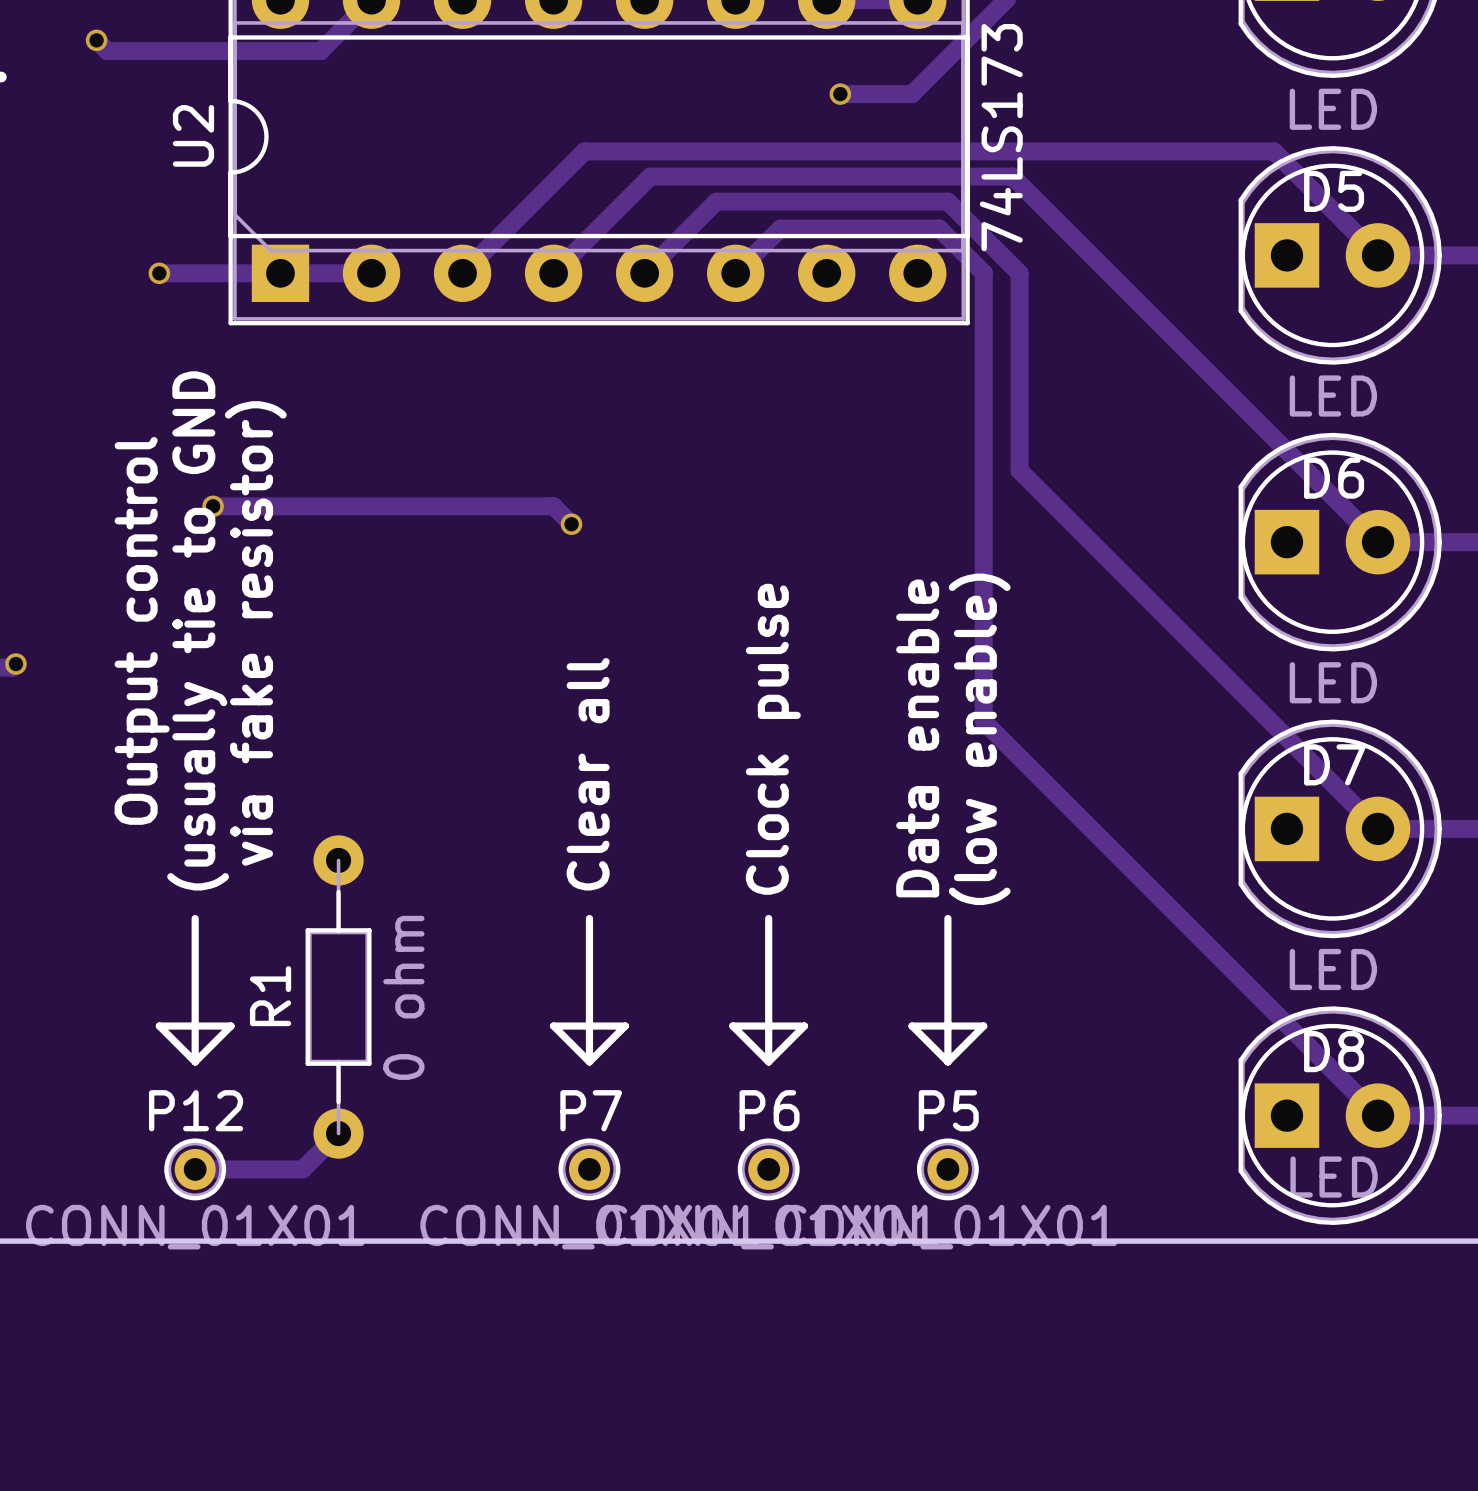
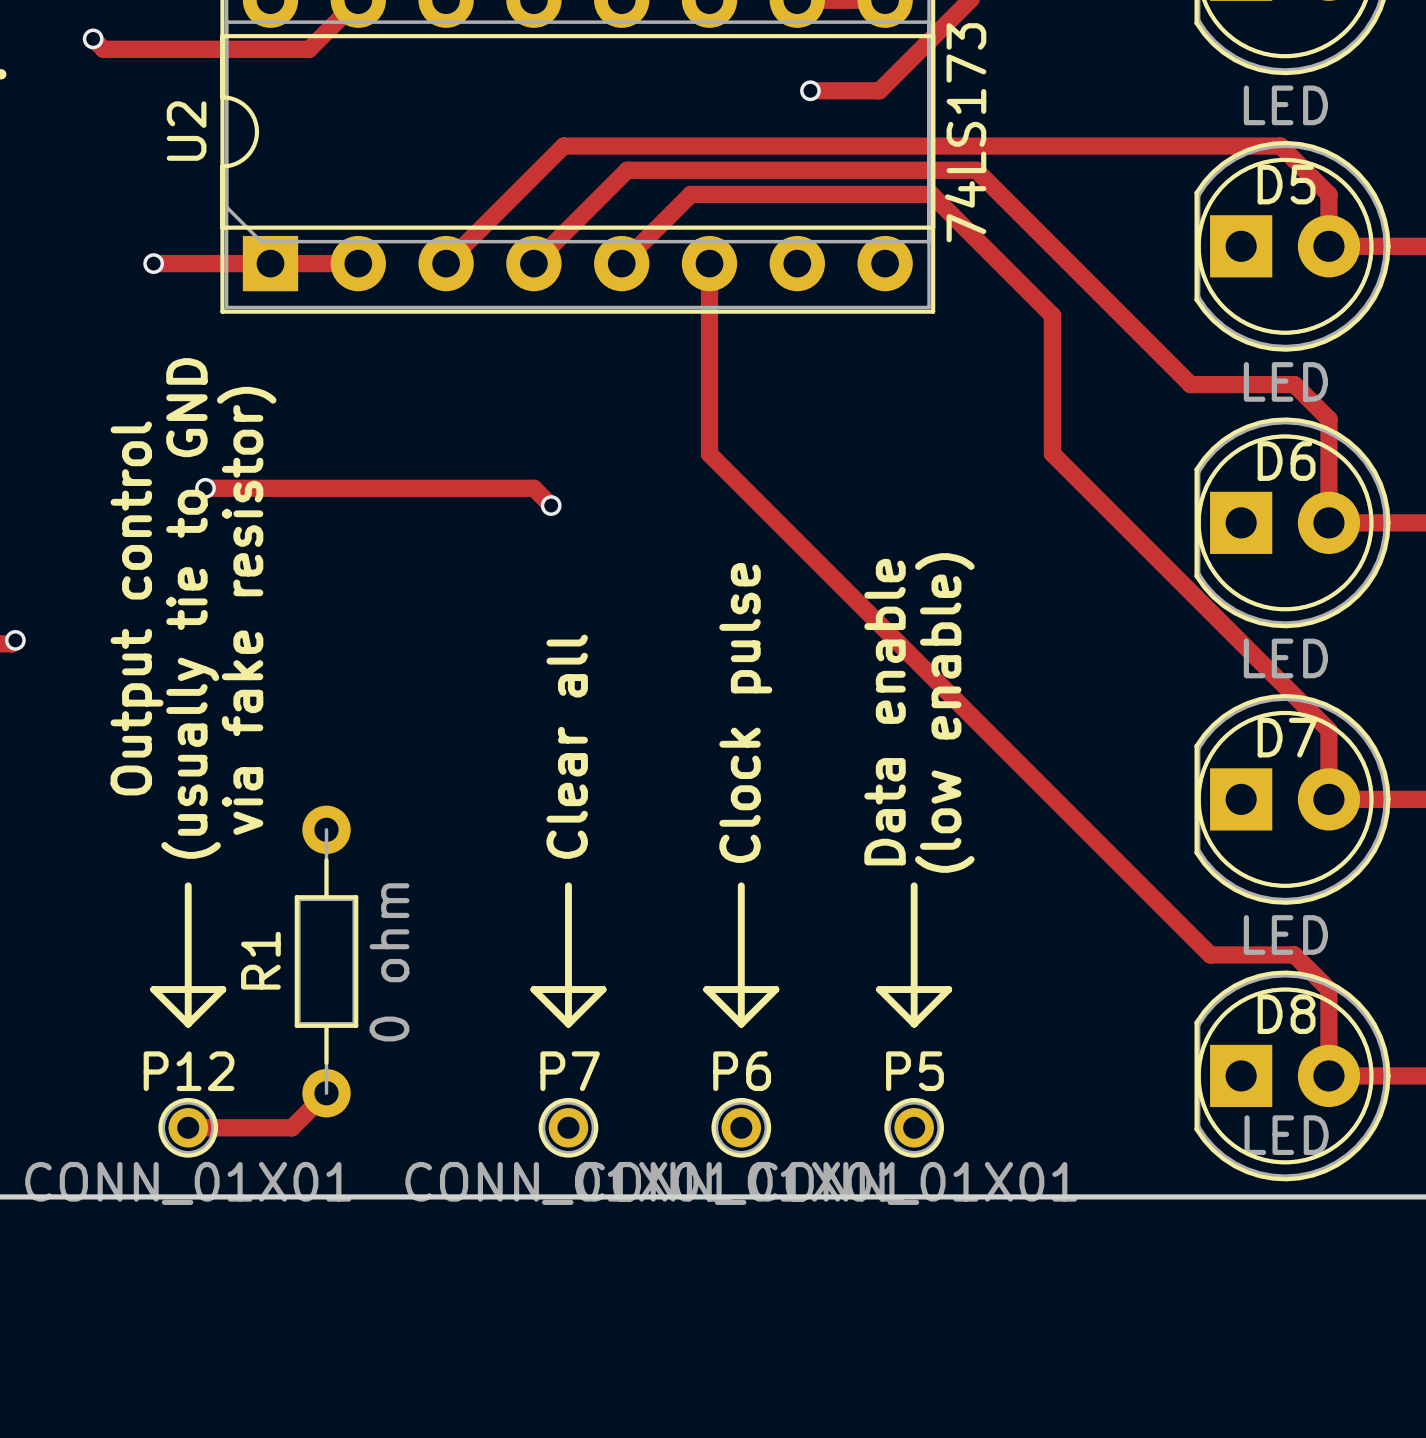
track: (1274, 151) (1378, 255) -> (1228, 146) (1280, 146) (1328, 194) (1328, 246)
track: (947, 201) (1019, 273) (1019, 470) (1378, 828) -> (914, 194) (931, 194) (1052, 315) (1052, 453) (1328, 730) (1328, 799)
track: (735, 273) (780, 228) (939, 228) (983, 272) (983, 721) (1378, 1115) -> (709, 263) (709, 454) (1210, 954) (1294, 954) (1328, 989) (1328, 1075)
track: (1234, 398) (1378, 542) -> (1190, 384) (1294, 384) (1328, 419) (1328, 522)

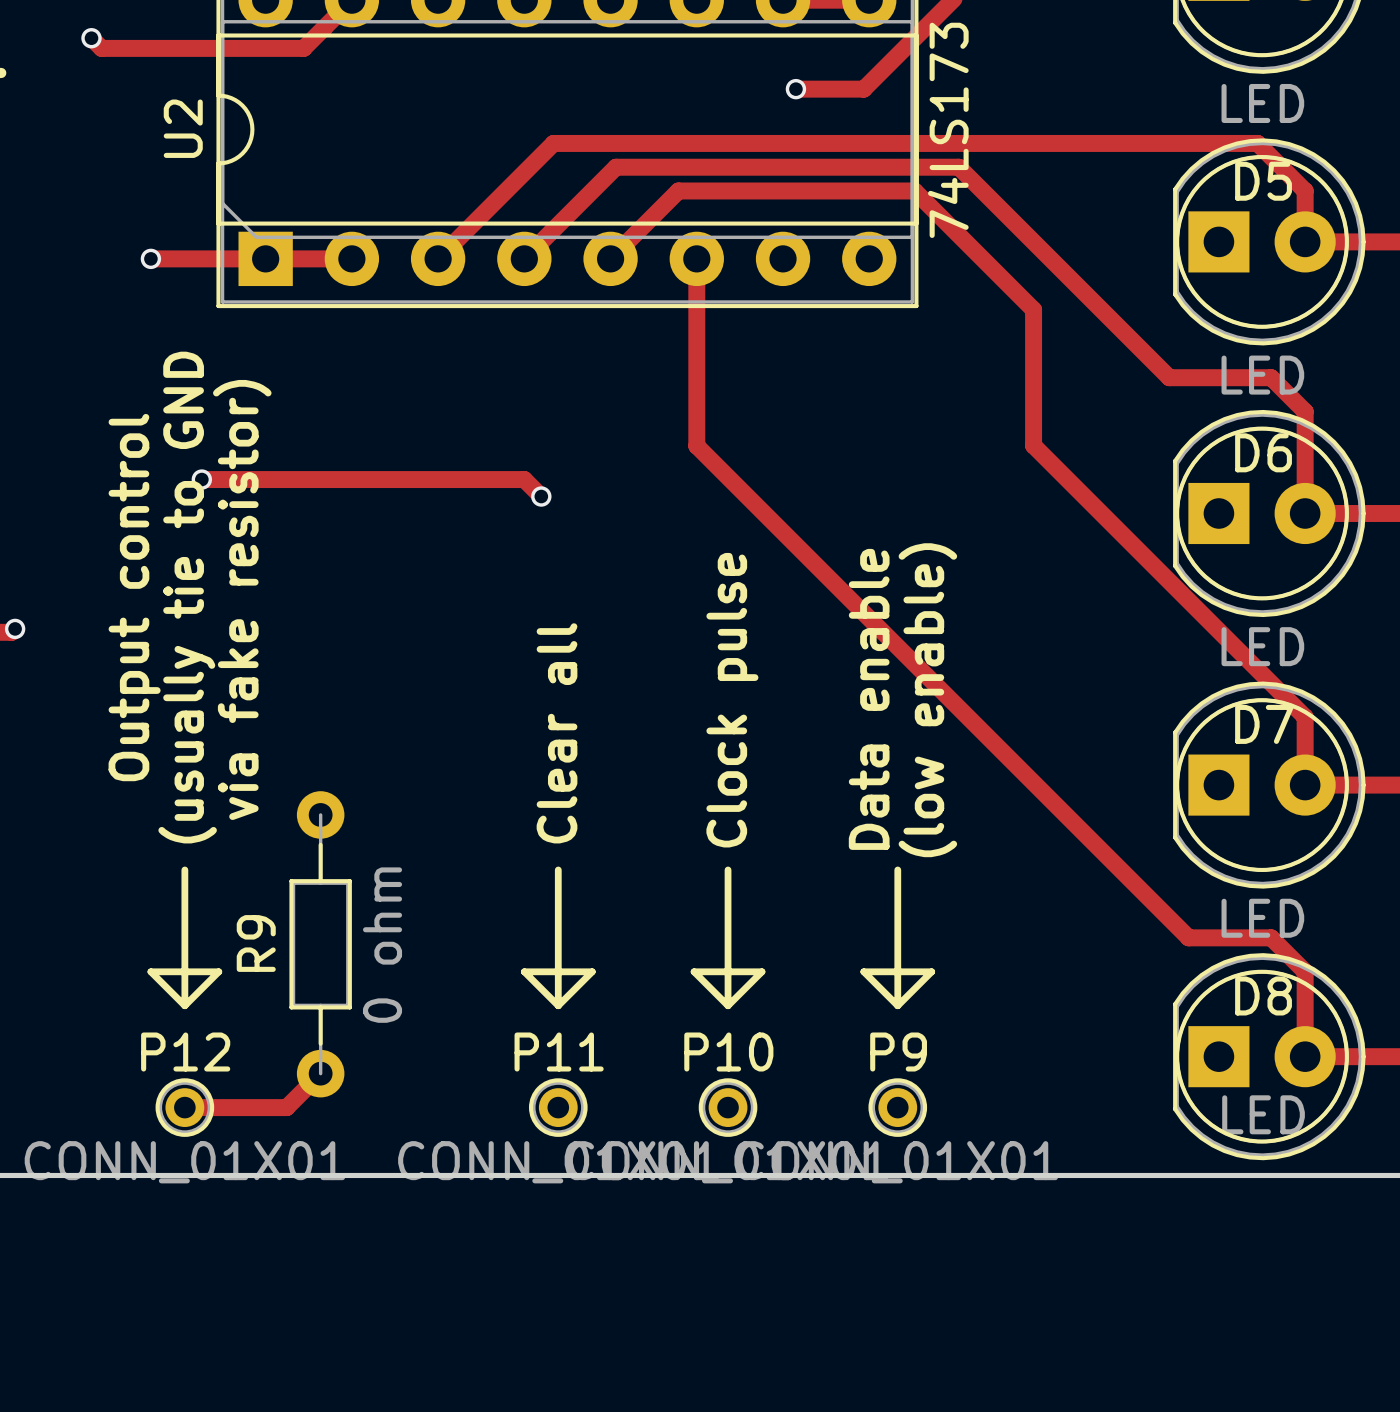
R1 name: R1 (260, 960) -> R9 (256, 943)
P7 name: P7 (570, 1071) -> P11 (559, 1052)
P6 name: P6 (742, 1071) -> P10 (728, 1052)
P5 name: P5 (914, 1071) -> P9 (898, 1052)

